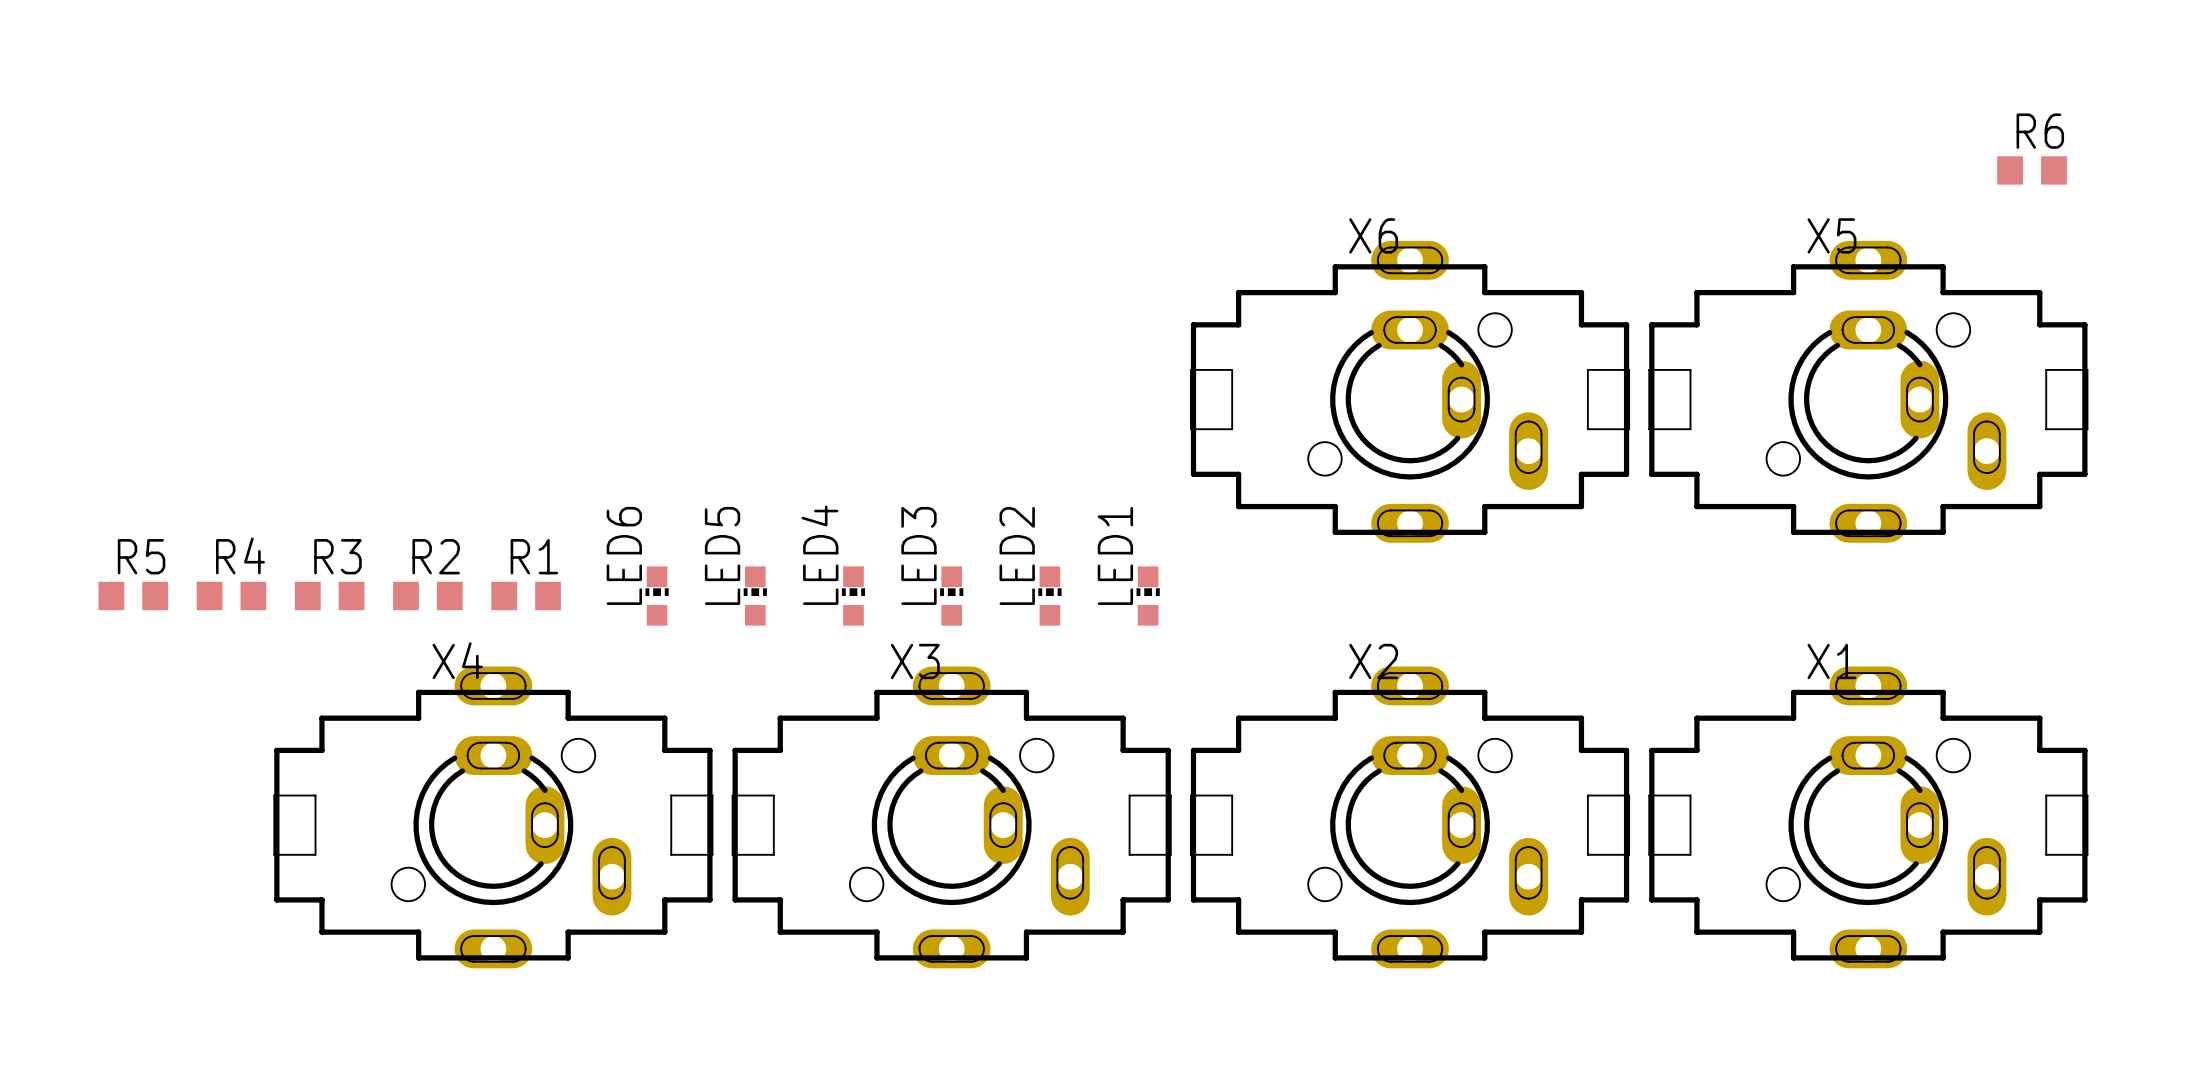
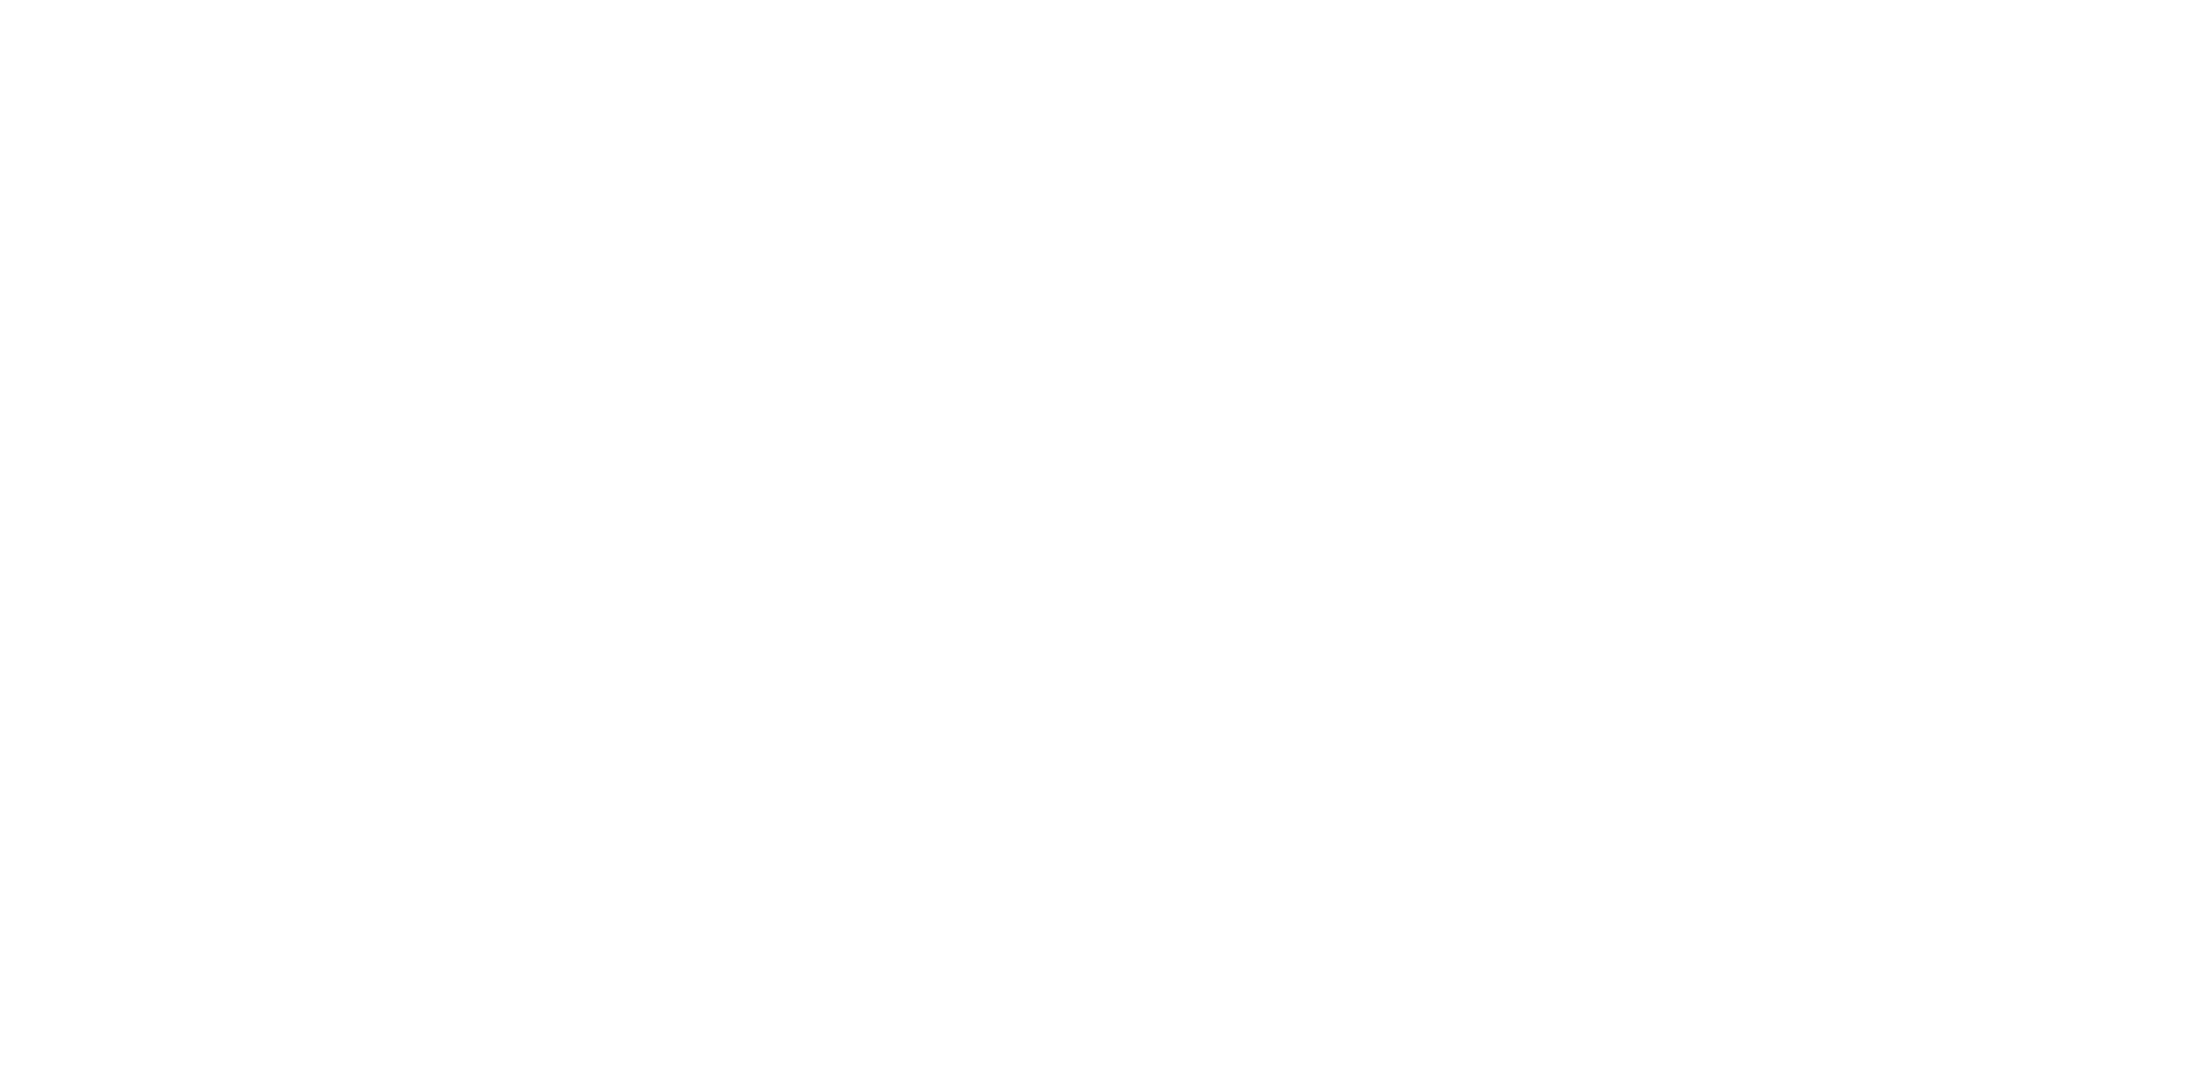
R6: (2032, 170) -> none
X6: (1410, 391) -> none
X5: (1868, 391) -> none
R5: (133, 596) -> none
R4: (231, 596) -> none
R3: (329, 596) -> none
R2: (427, 596) -> none
R1: (526, 596) -> none
LED6: (657, 596) -> none
LED5: (755, 596) -> none
LED4: (853, 596) -> none
LED3: (951, 596) -> none
LED2: (1049, 596) -> none
LED1: (1148, 596) -> none
X4: (493, 817) -> none
X3: (951, 817) -> none
X2: (1410, 817) -> none
X1: (1868, 817) -> none

